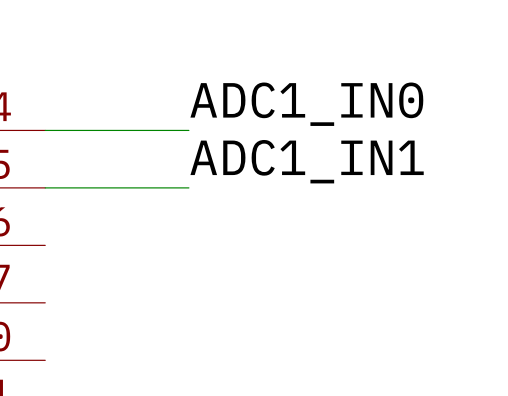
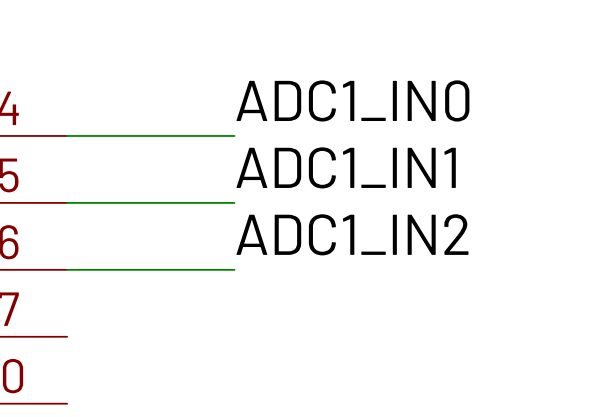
label: none -> ADC1_IN2 (352, 234)
wire: none -> (67, 269) (234, 269)

